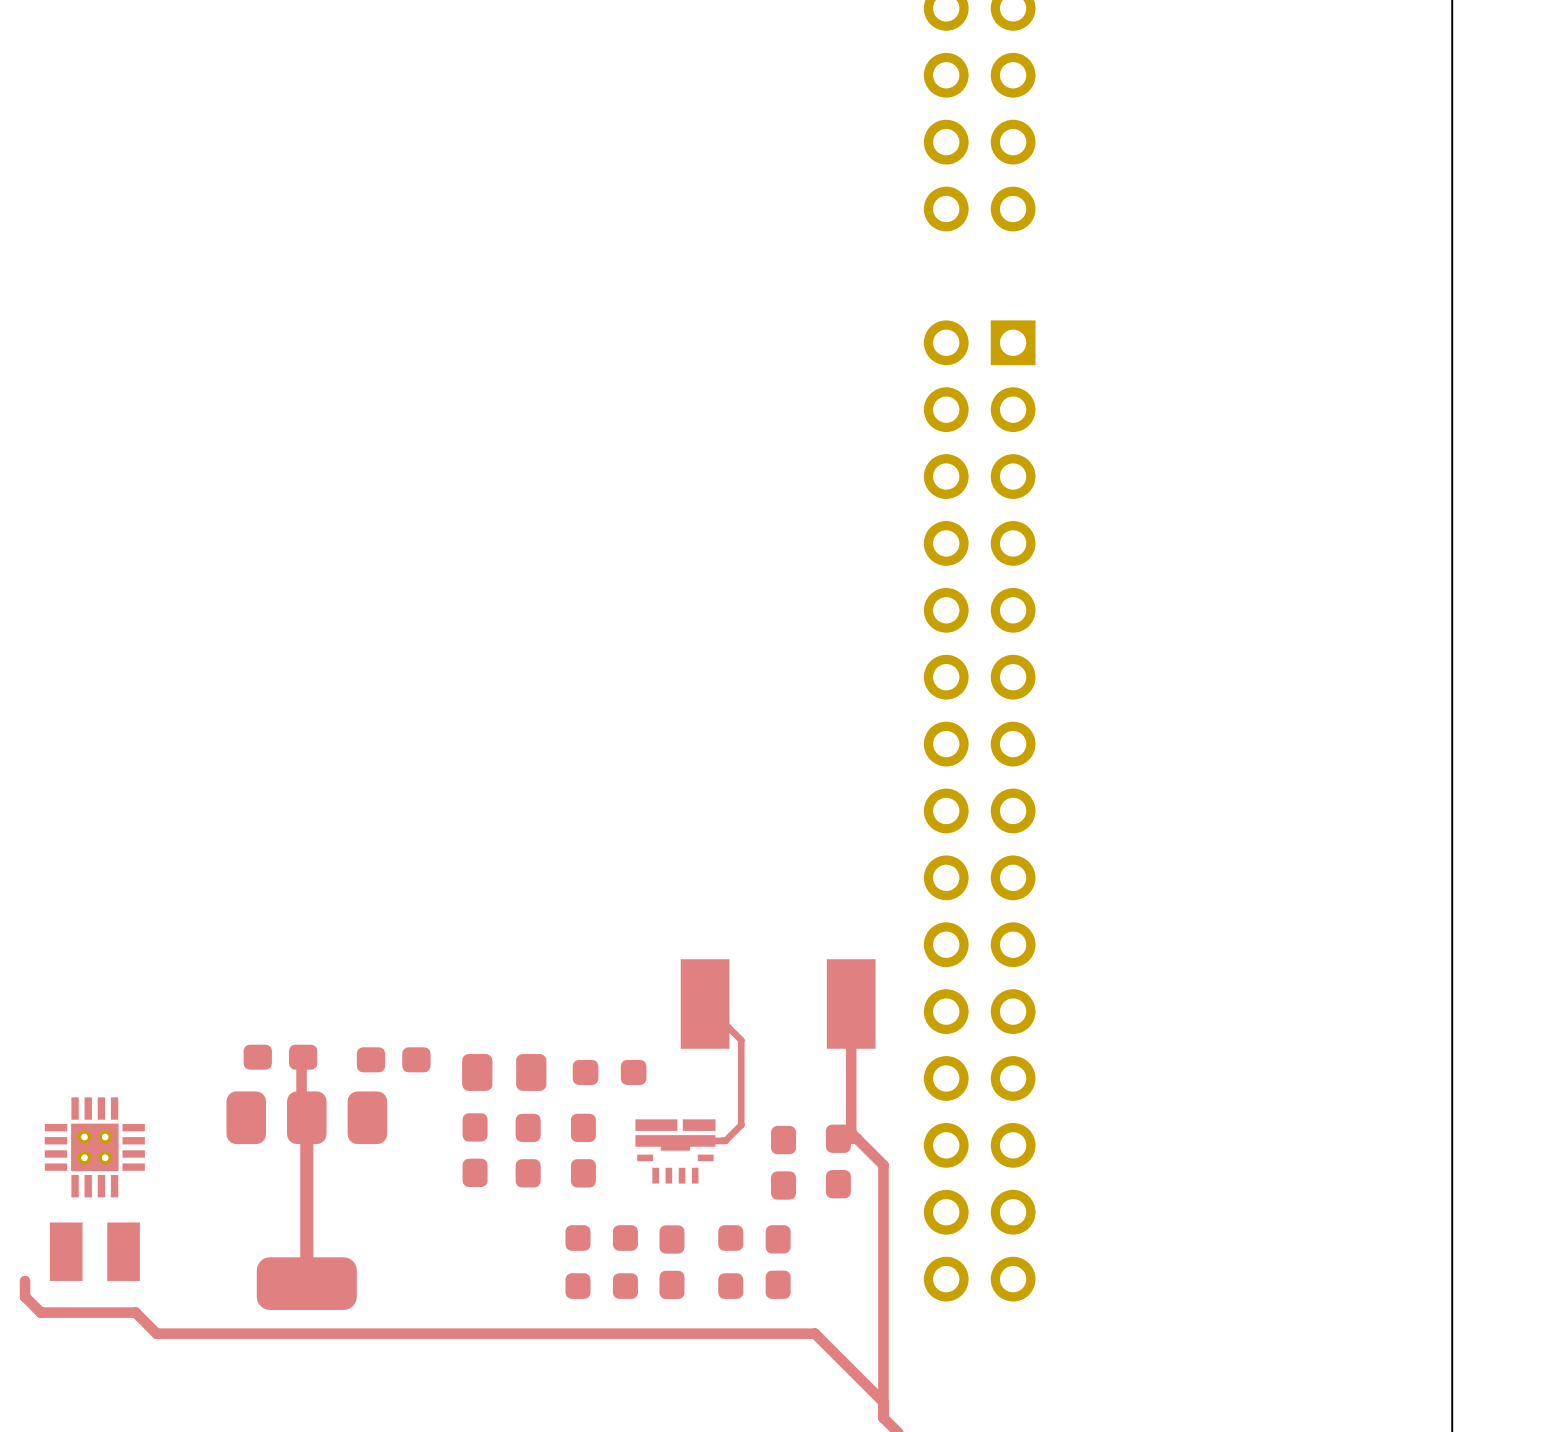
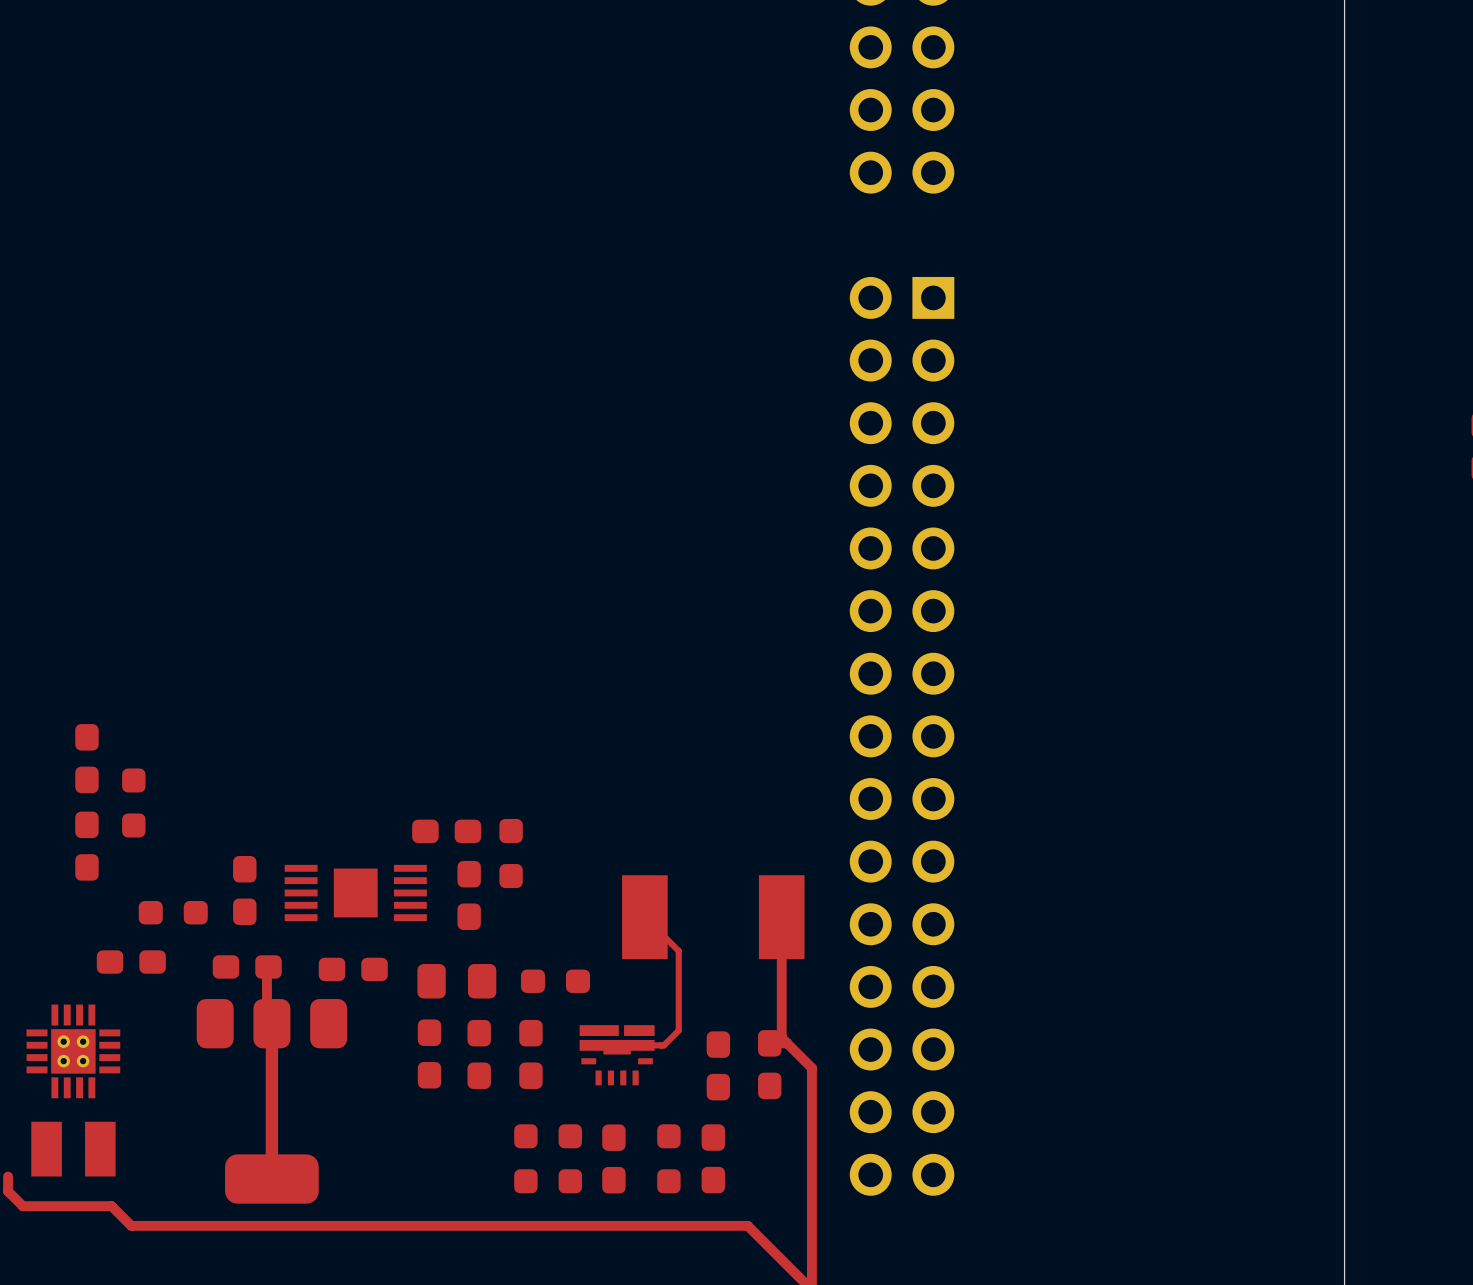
part: none -> (86, 758)
part: none -> (133, 802)
part: none -> (446, 831)
part: none -> (86, 846)
part: none -> (511, 853)
part: none -> (244, 890)
part: none -> (355, 892)
part: none -> (469, 895)
part: none -> (173, 912)
part: none -> (131, 962)

